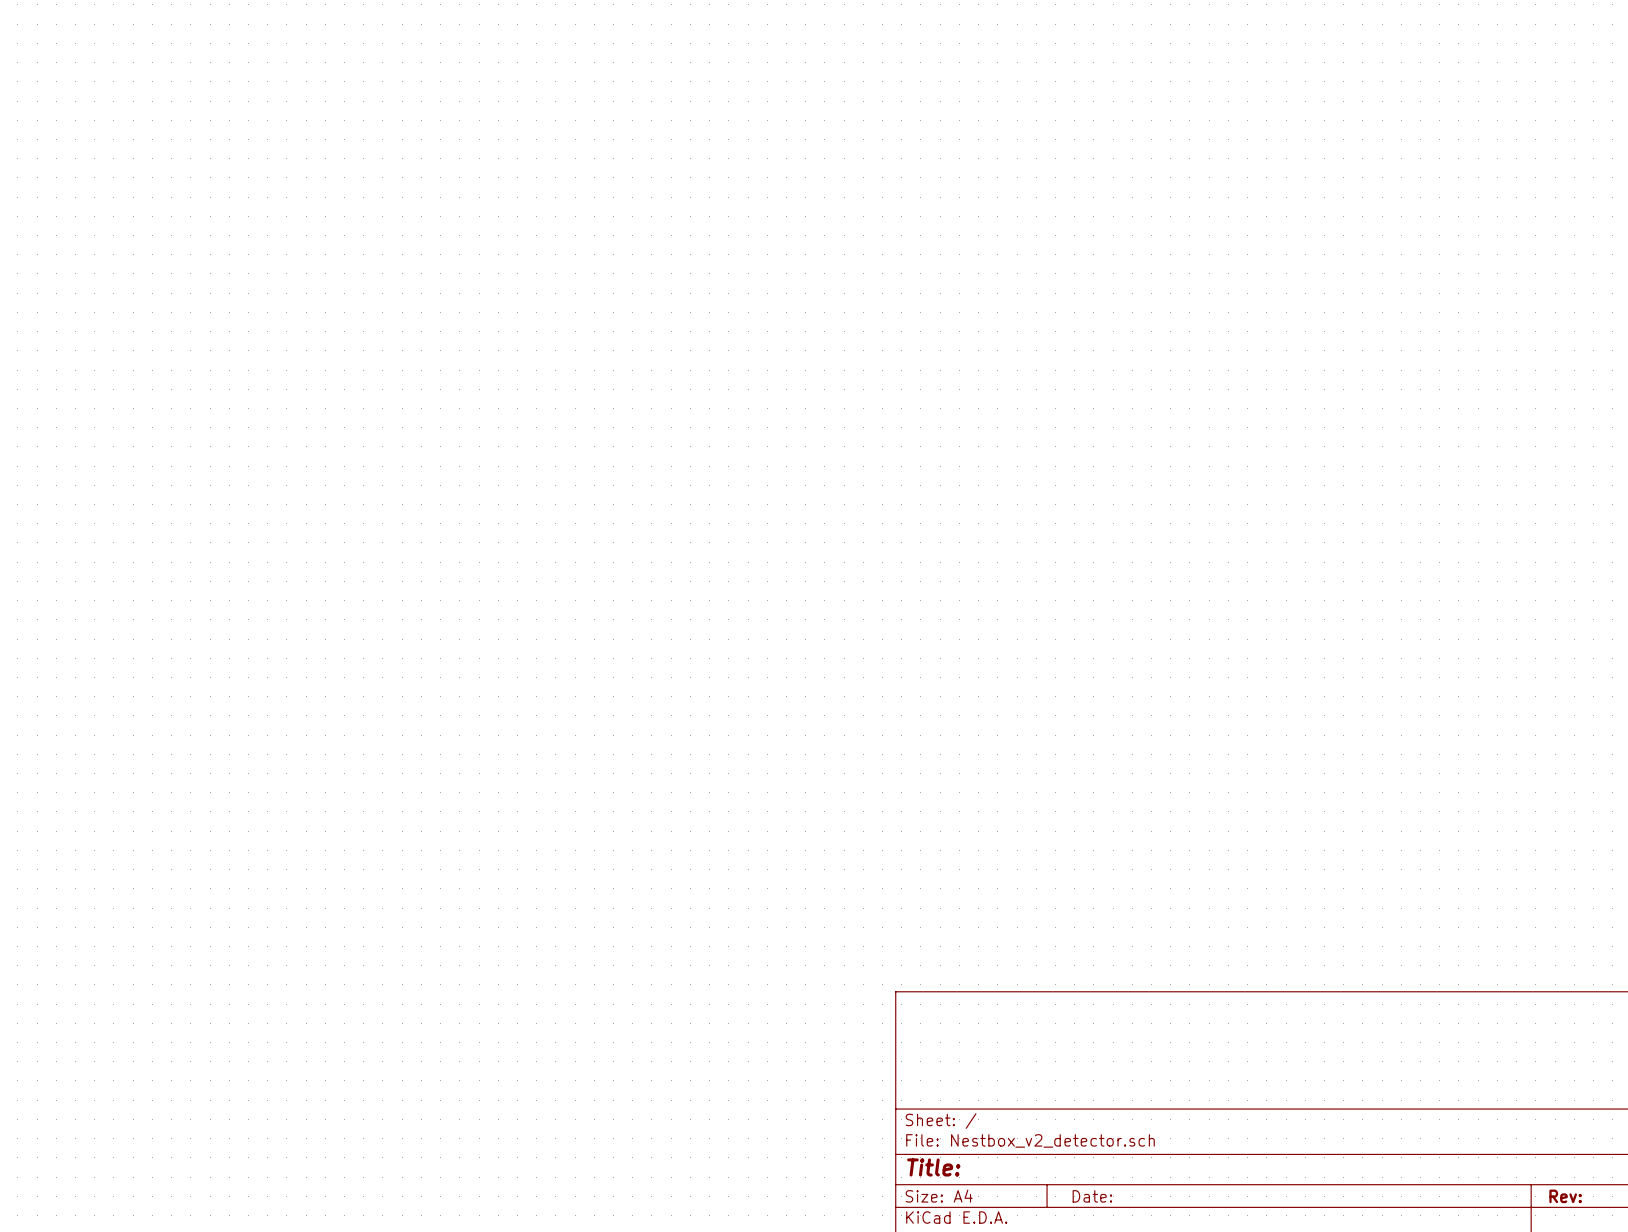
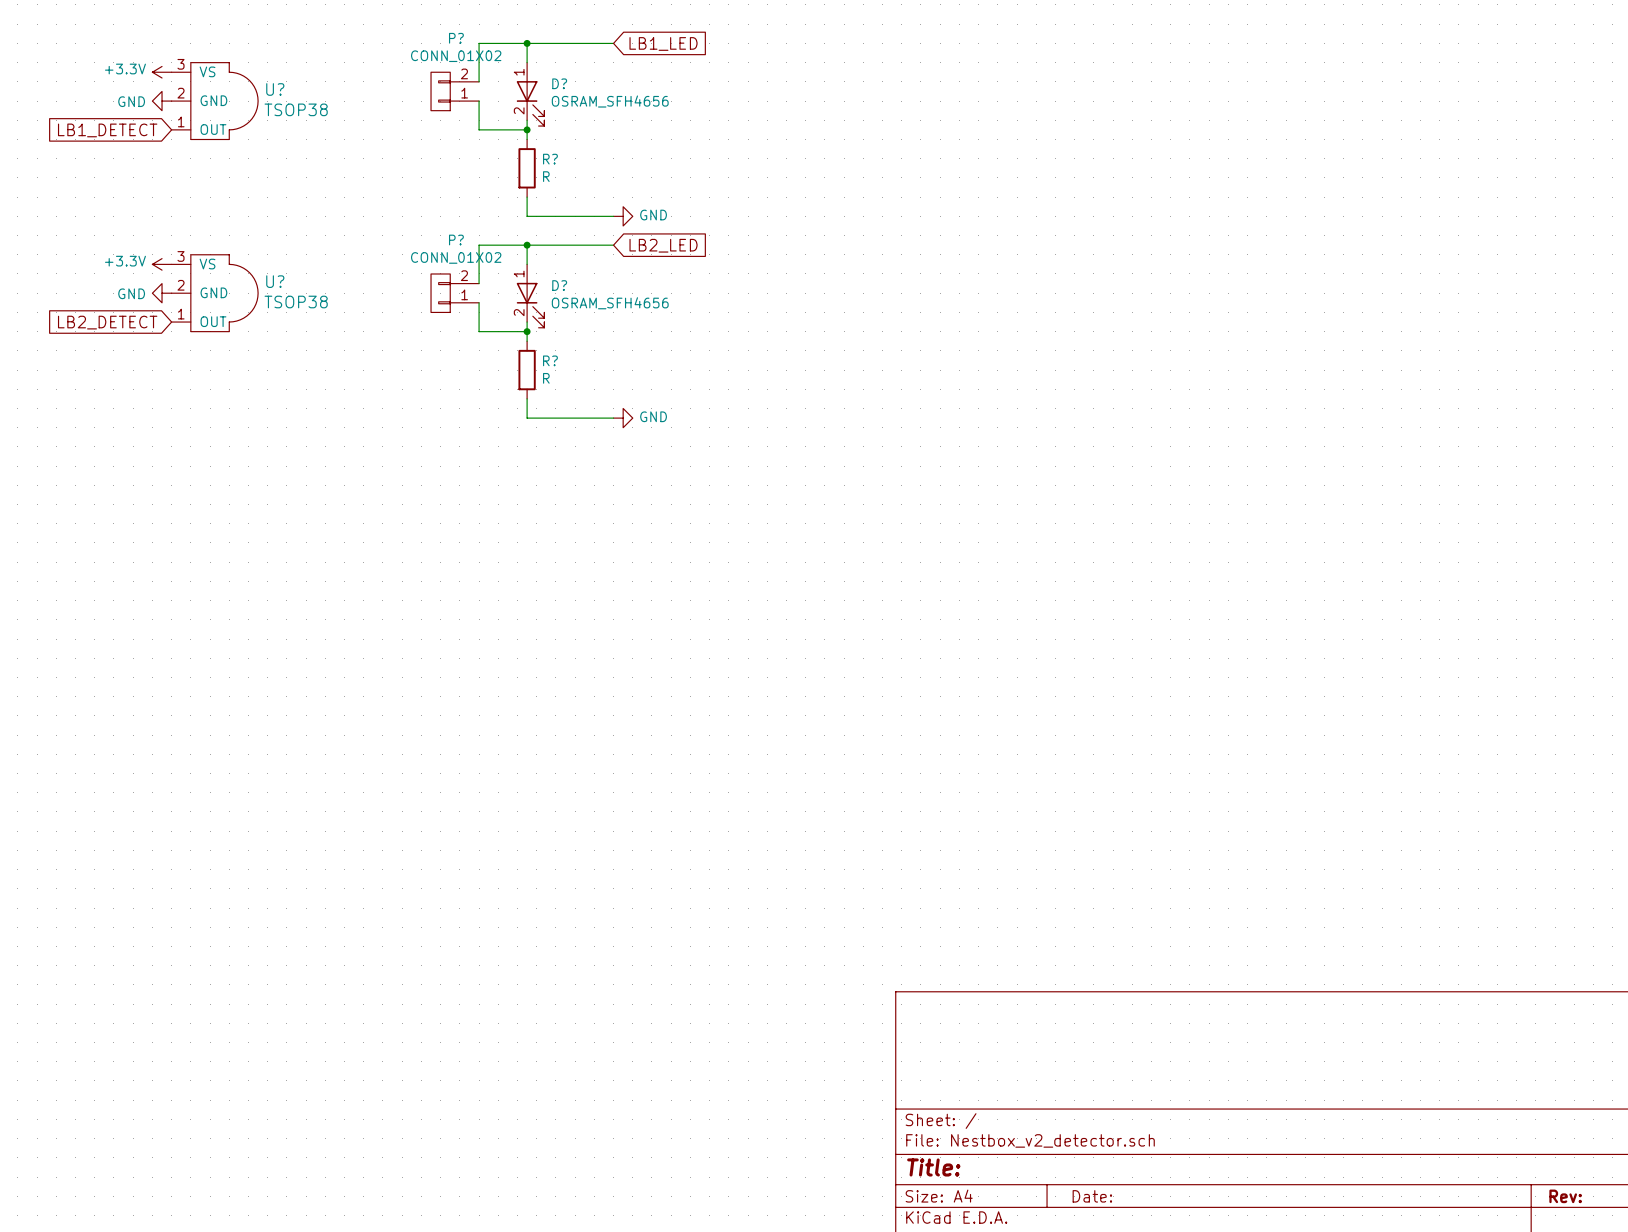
wire: none -> (527, 43) (527, 62)
junction: none -> (527, 43)
wire: none -> (613, 43) (479, 43) (479, 81)
global label: none -> LB1_LED (663, 43)
power symbol: none -> +3.3V (162, 72)
P?: none -> CONN_01X02 (455, 91)
D?: none -> OSRAM_SFH4656 (530, 94)
power symbol: none -> GND (162, 101)
U?: none -> TSOP38 (214, 101)
wire: none -> (479, 101) (479, 129) (527, 129)
wire: none -> (527, 120) (527, 139)
junction: none -> (527, 129)
global label: none -> LB1_DETECT (107, 130)
R?: none -> R (527, 168)
wire: none -> (527, 197) (527, 216) (613, 216)
power symbol: none -> GND (623, 216)
wire: none -> (527, 245) (527, 264)
junction: none -> (527, 245)
wire: none -> (613, 245) (479, 245) (479, 283)
global label: none -> LB2_LED (663, 245)
power symbol: none -> +3.3V (162, 264)
power symbol: none -> GND (162, 293)
U?: none -> TSOP38 (214, 293)
P?: none -> CONN_01X02 (455, 293)
D?: none -> OSRAM_SFH4656 (530, 296)
wire: none -> (479, 302) (479, 331) (527, 331)
global label: none -> LB2_DETECT (107, 322)
wire: none -> (527, 322) (527, 341)
junction: none -> (527, 331)
R?: none -> R (527, 370)
wire: none -> (527, 398) (527, 418) (613, 418)
power symbol: none -> GND (623, 418)

